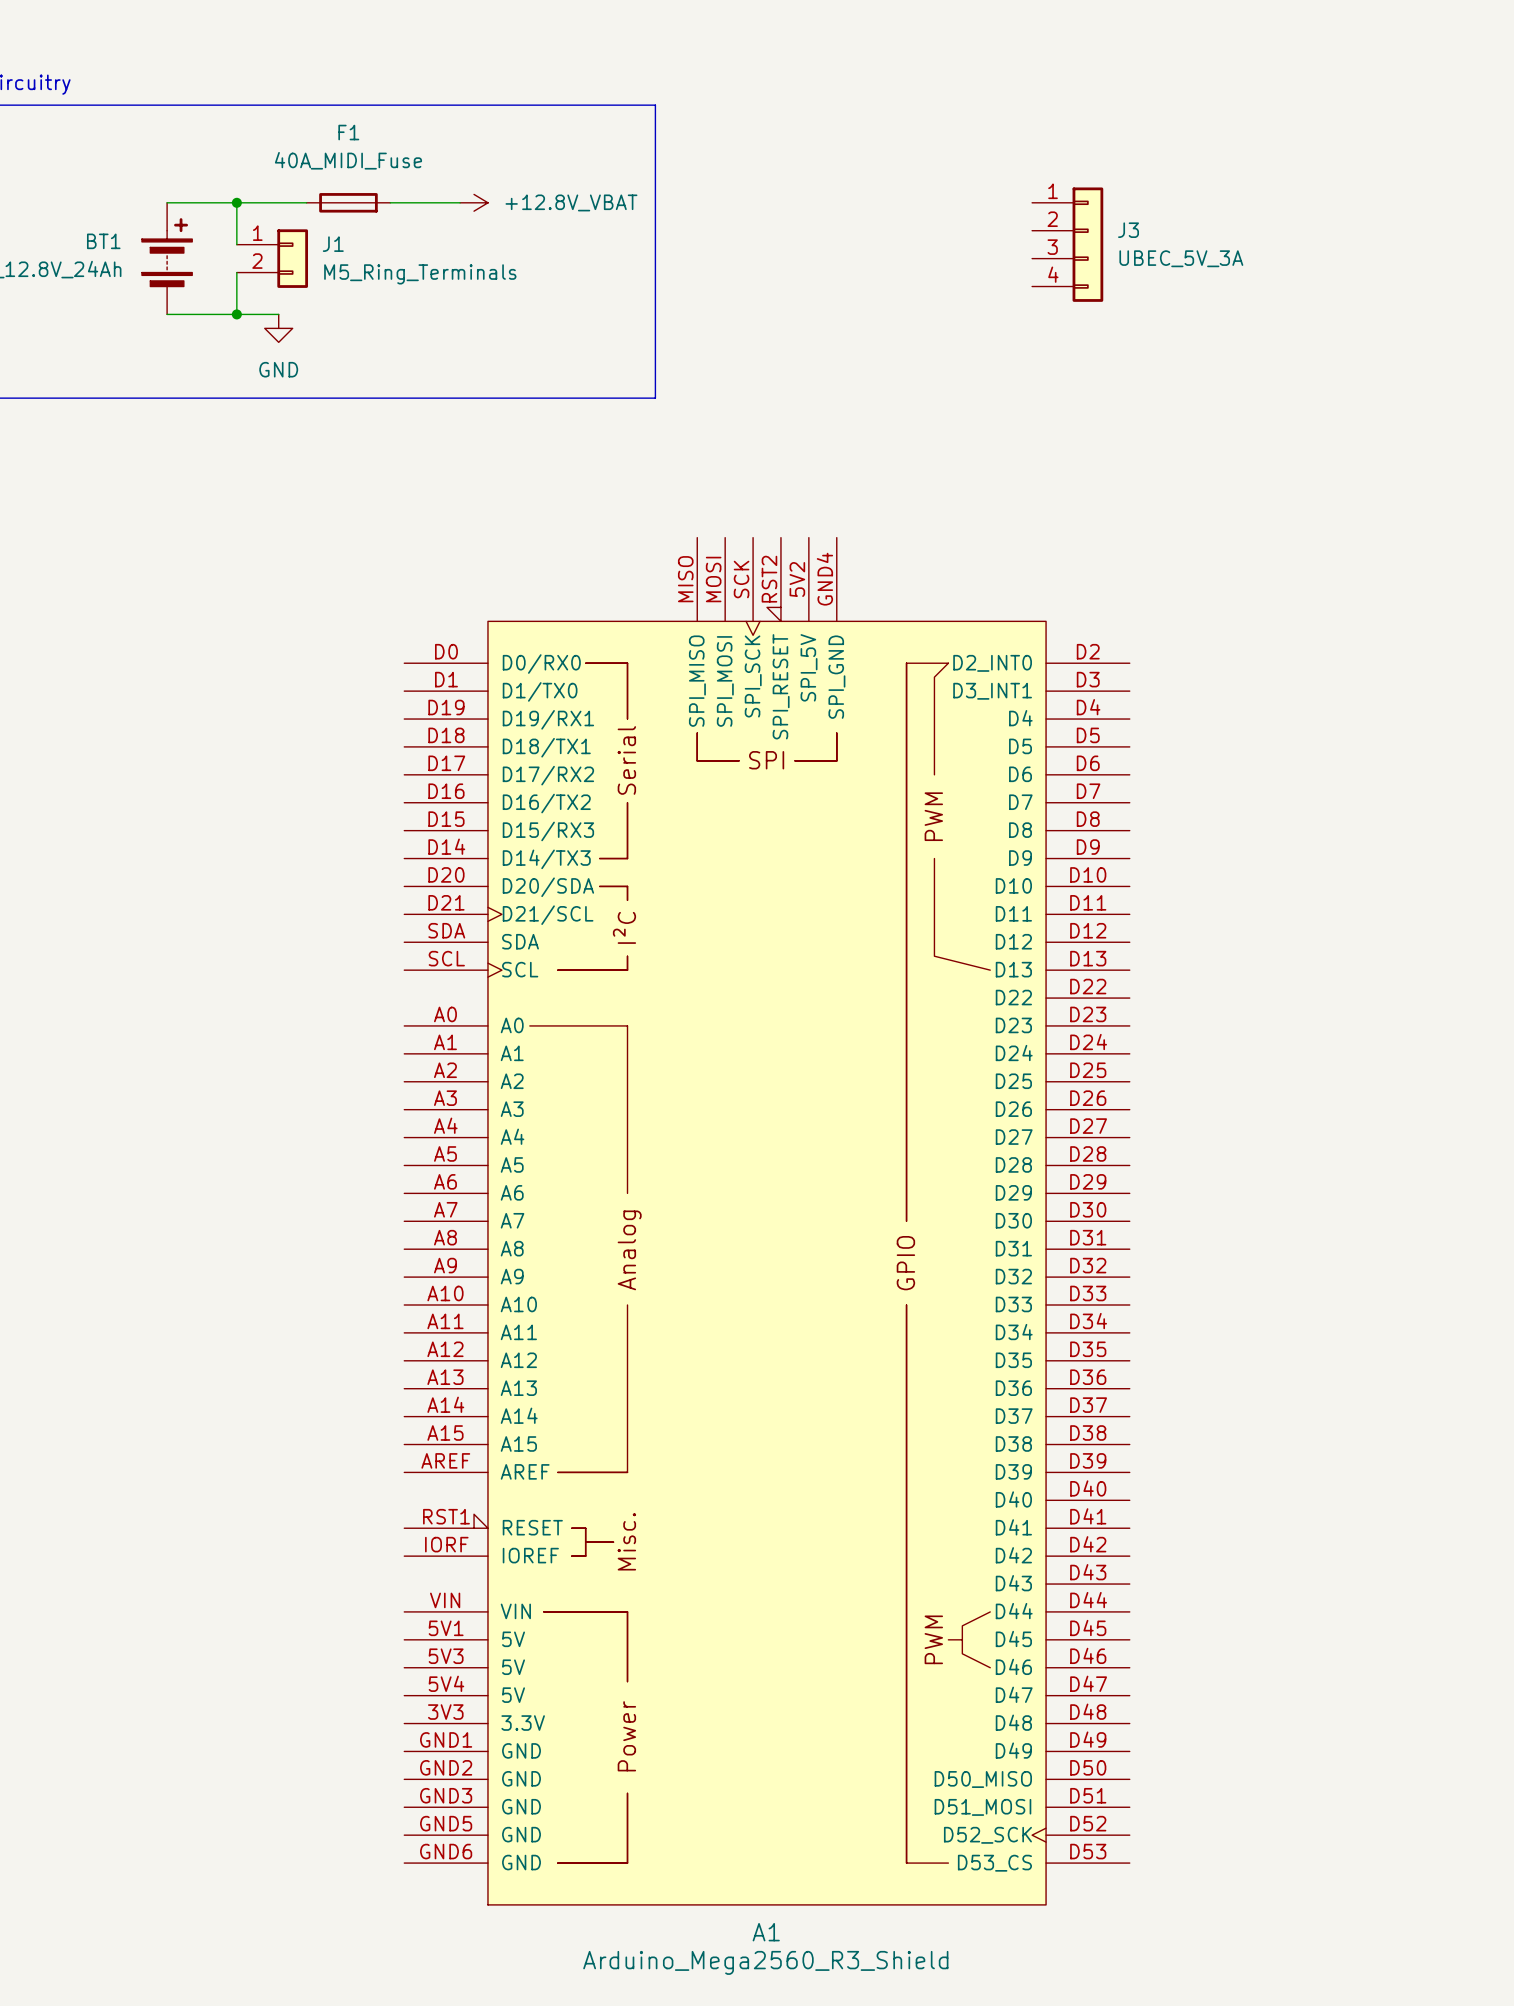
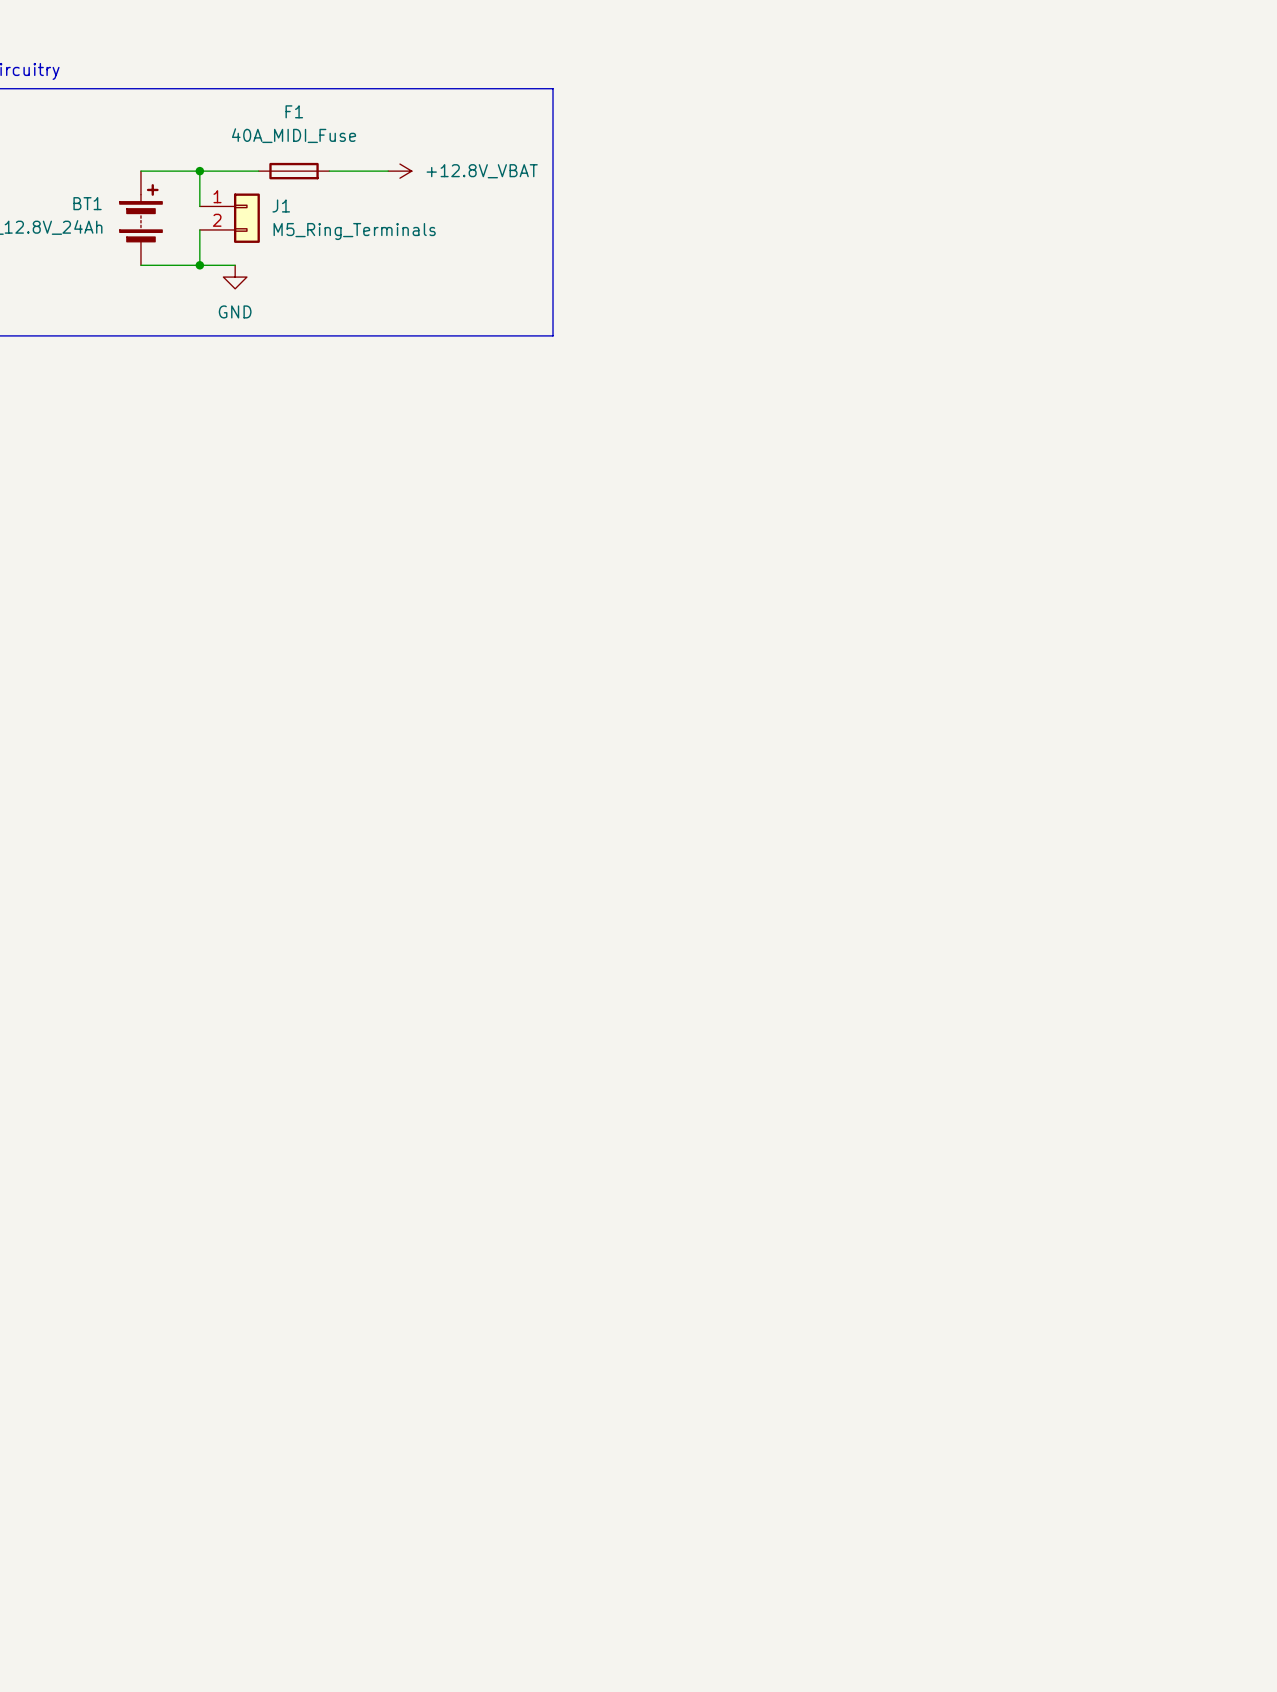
J3: UBEC_5V_3A (1067, 244) -> none
A1: Arduino_Mega2560_R3_Shield (767, 1221) -> none

